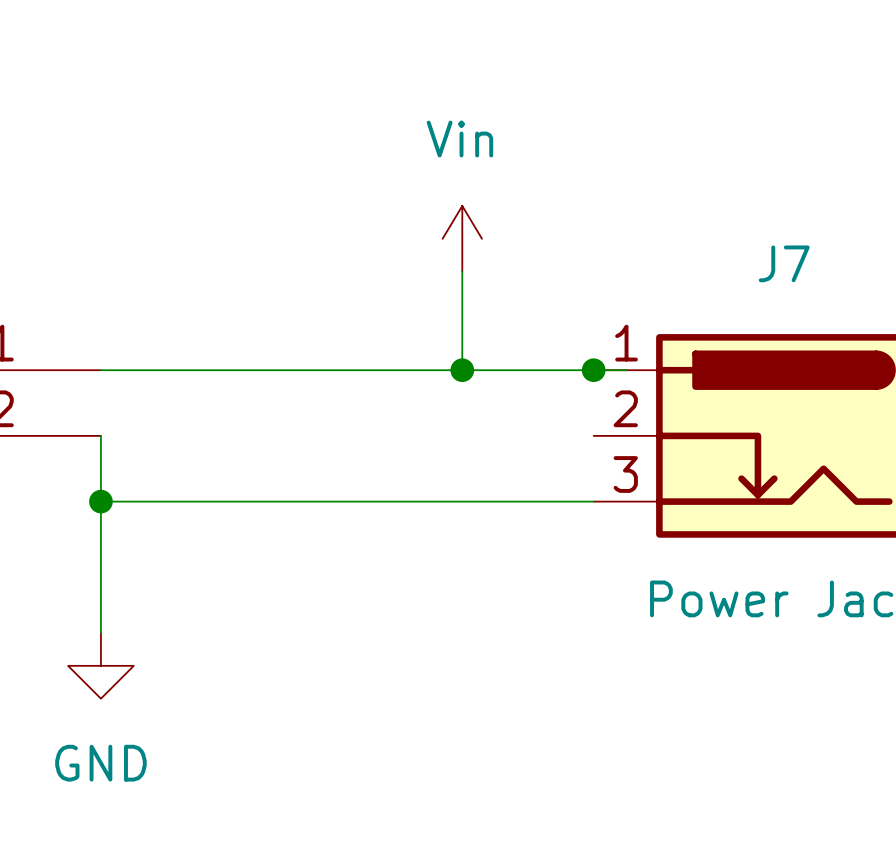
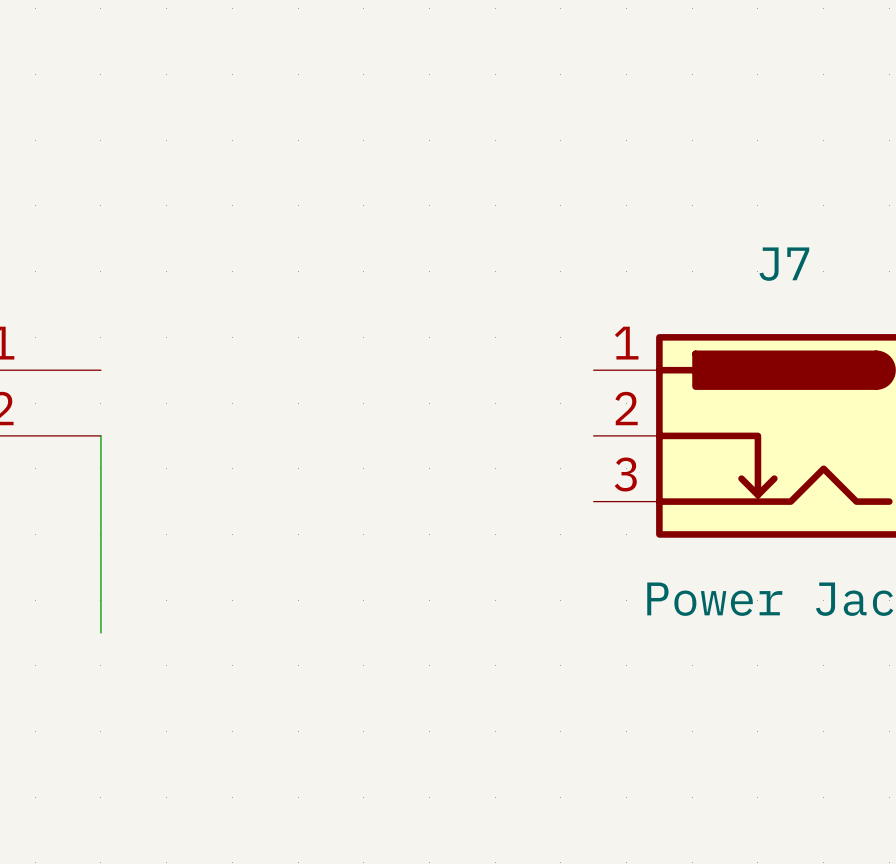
power symbol: Vin (462, 238) -> none
wire: (462, 271) (462, 370) -> none
wire: (100, 370) (626, 370) -> none
junction: (462, 370) -> none
junction: (593, 370) -> none
wire: (100, 501) (593, 501) -> none
junction: (100, 501) -> none
power symbol: GND (100, 665) -> none

